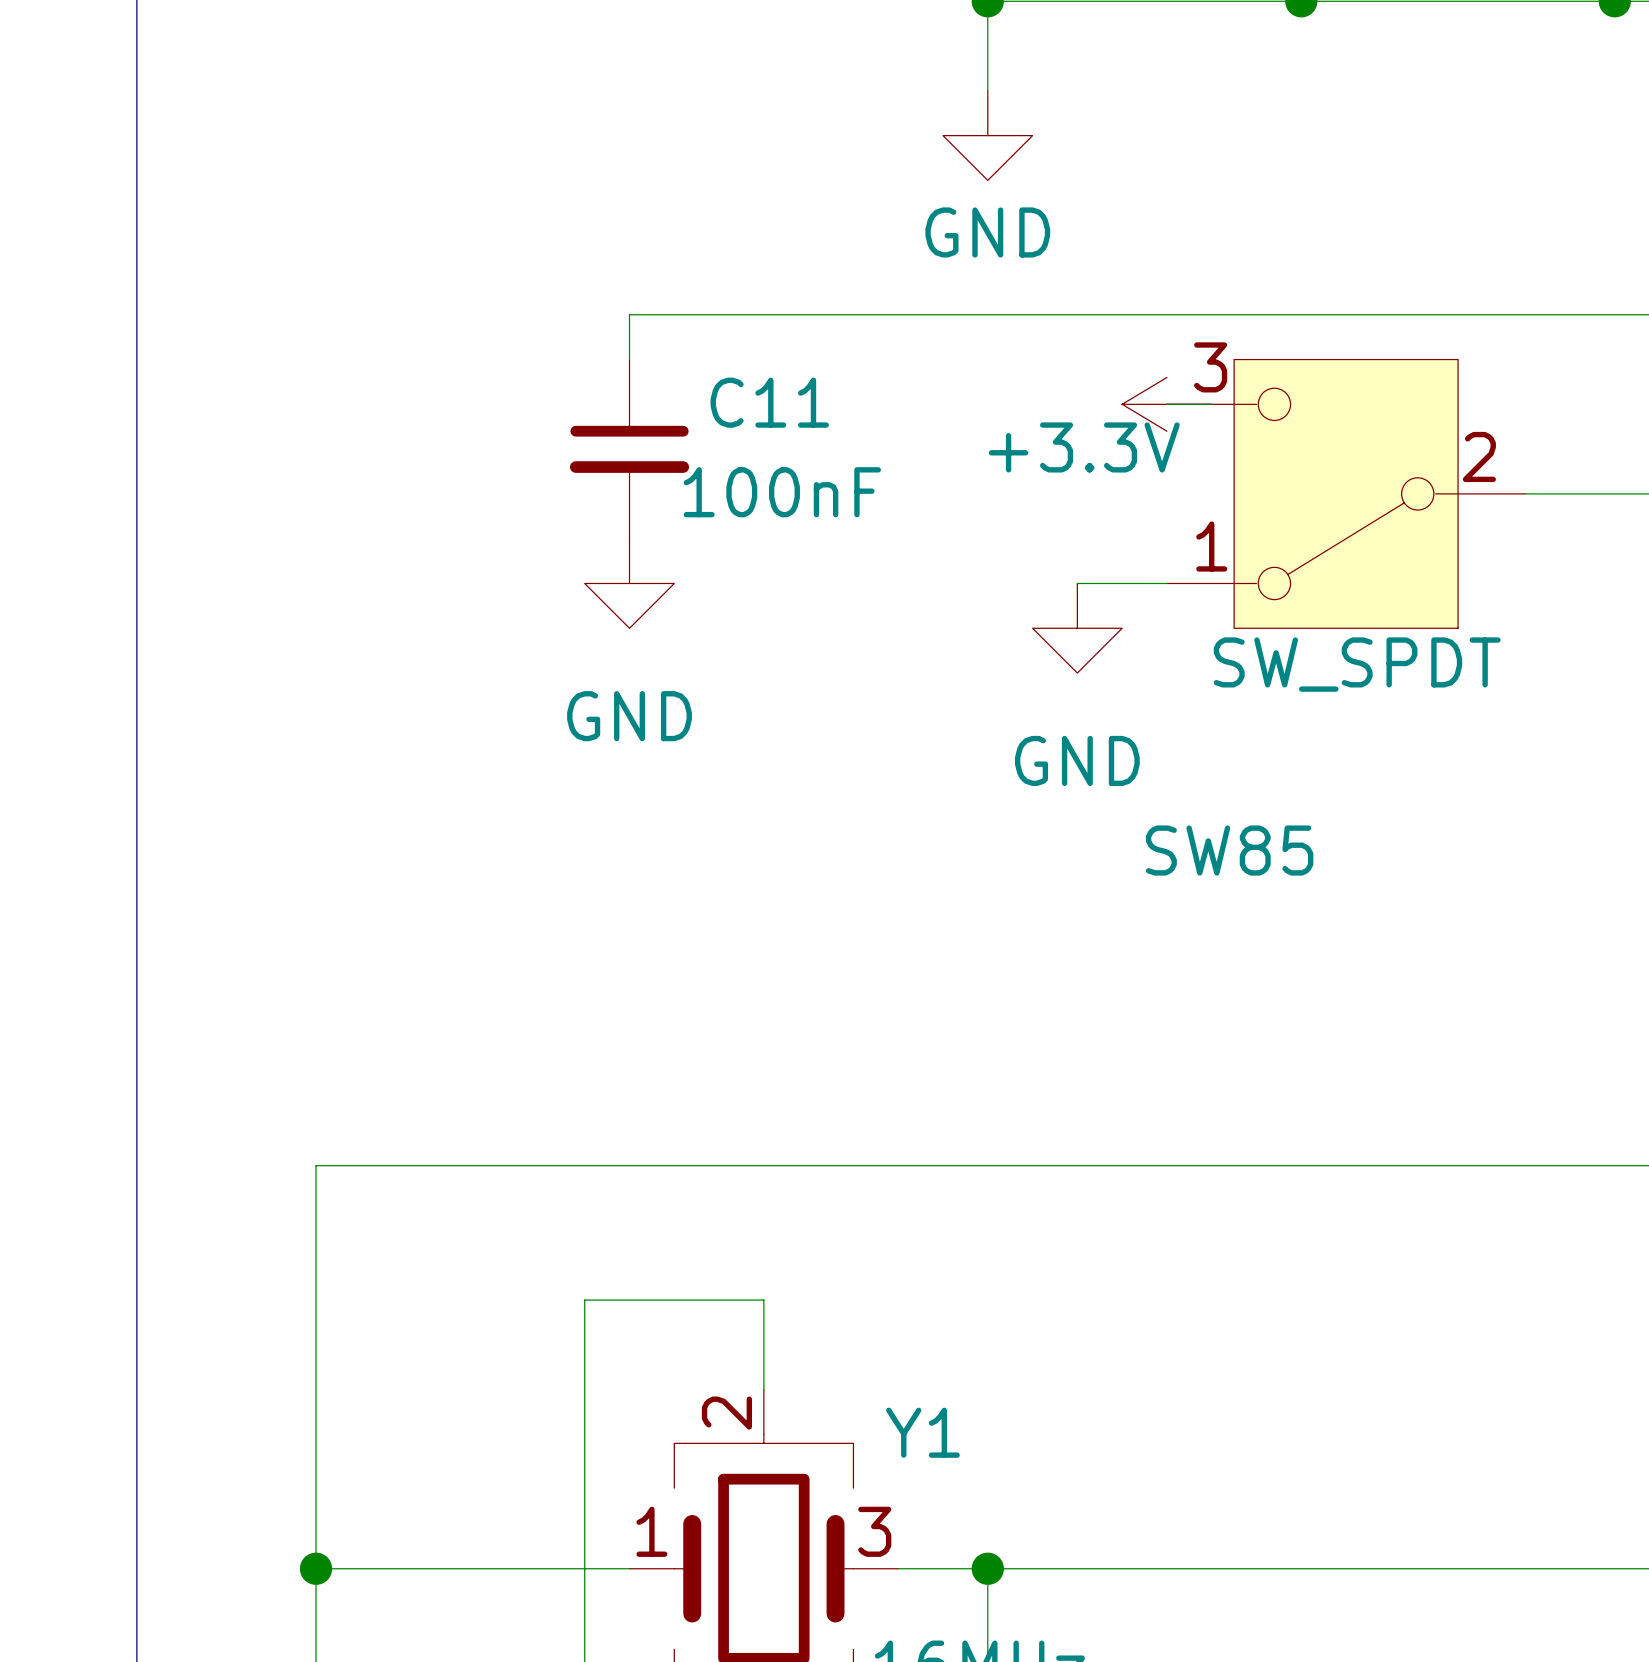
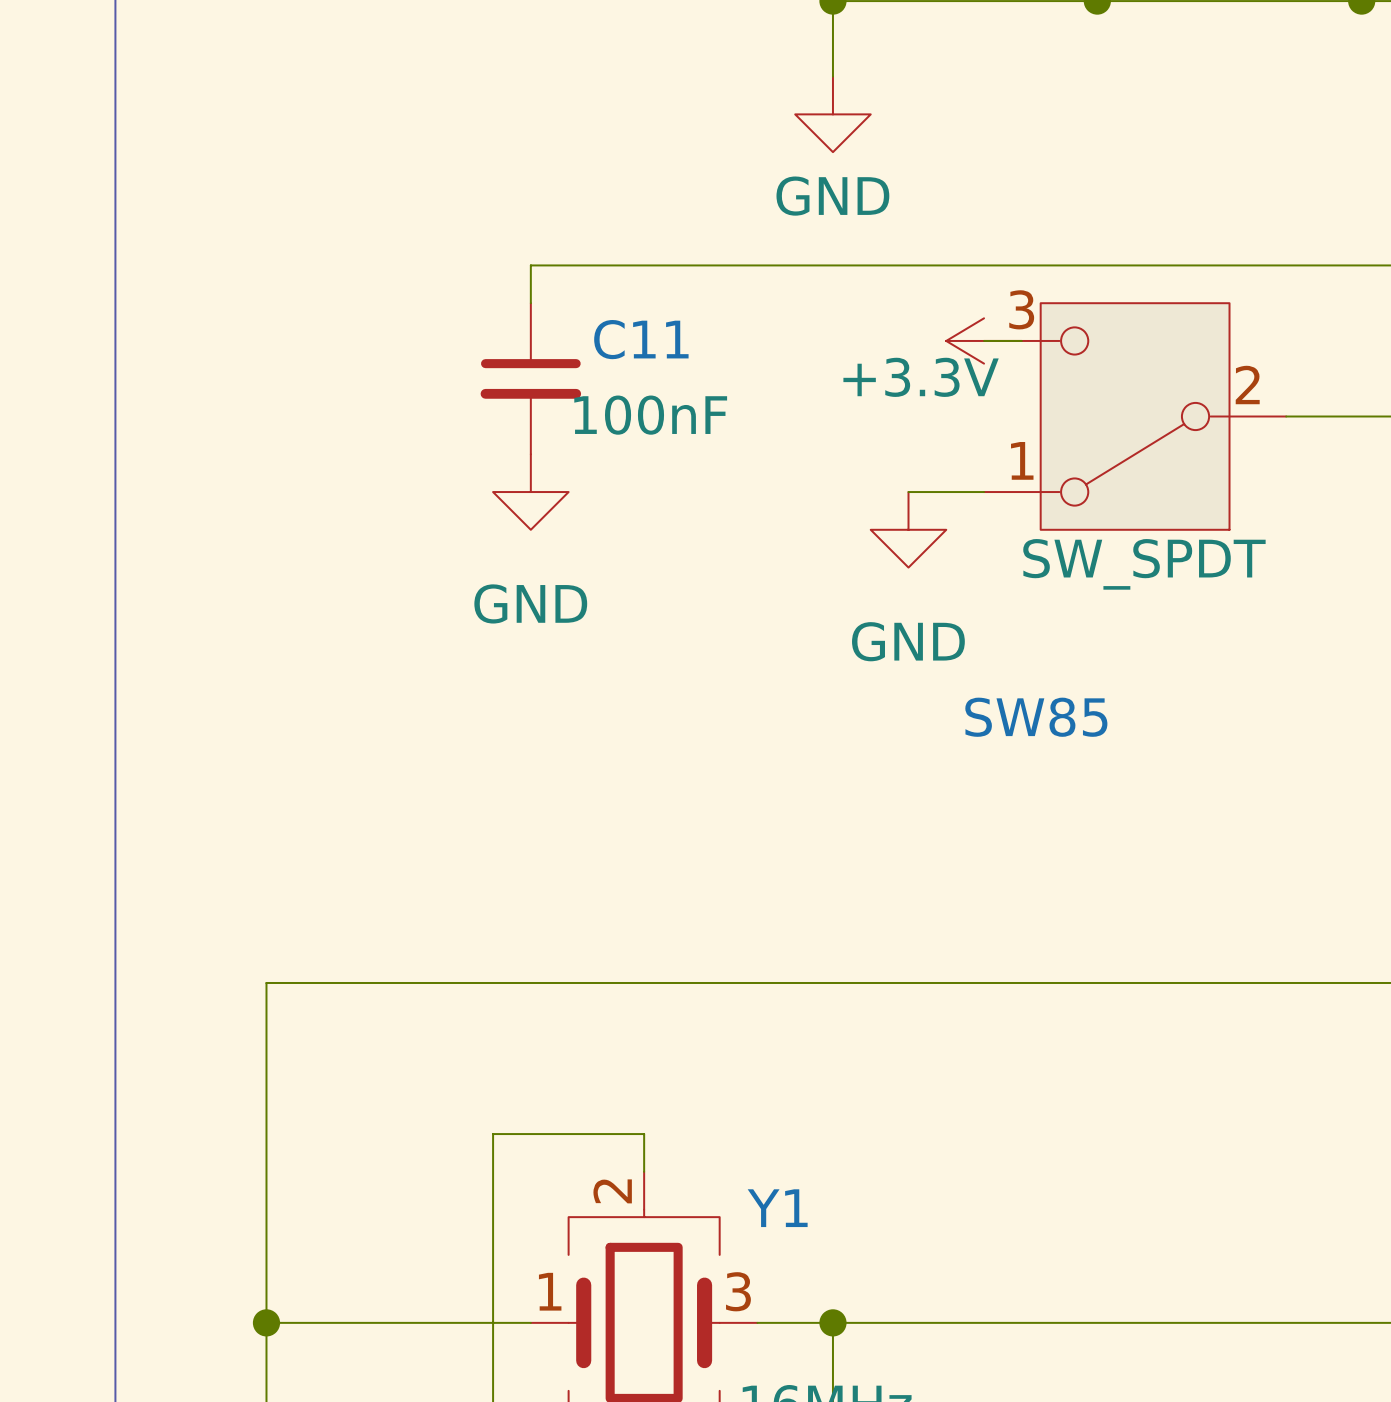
wire: (584, 1344) (584, 1300) (763, 1300) (763, 1344) -> (493, 1134) (644, 1134)

